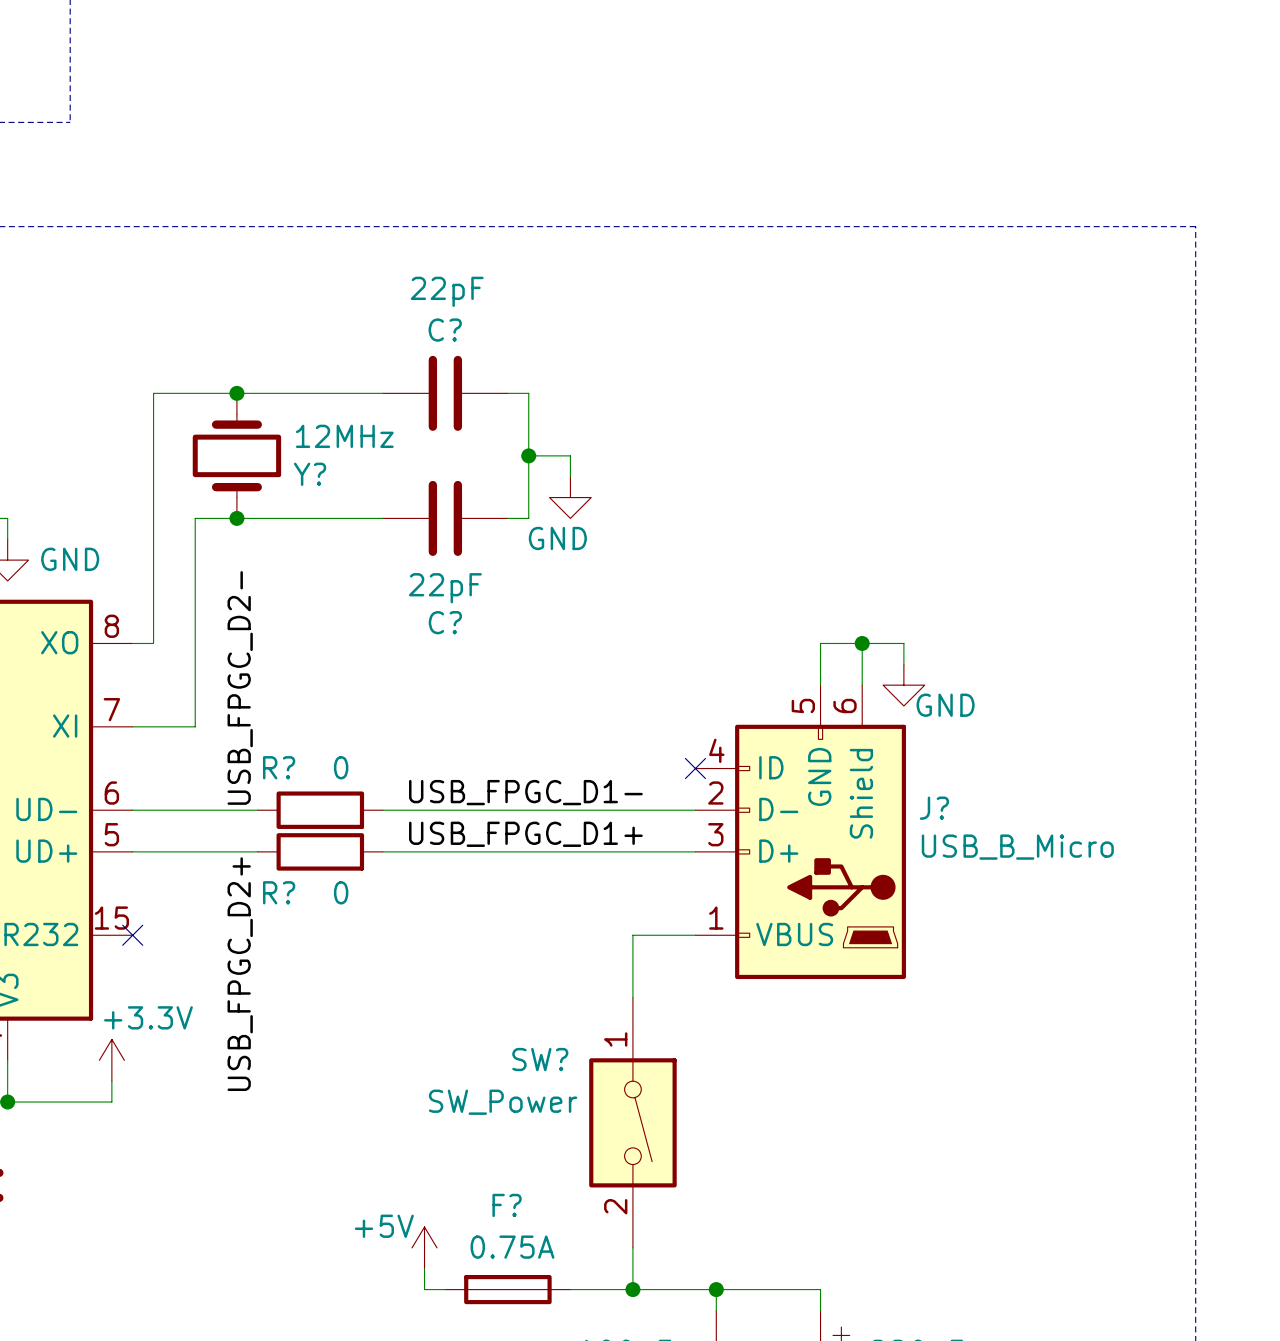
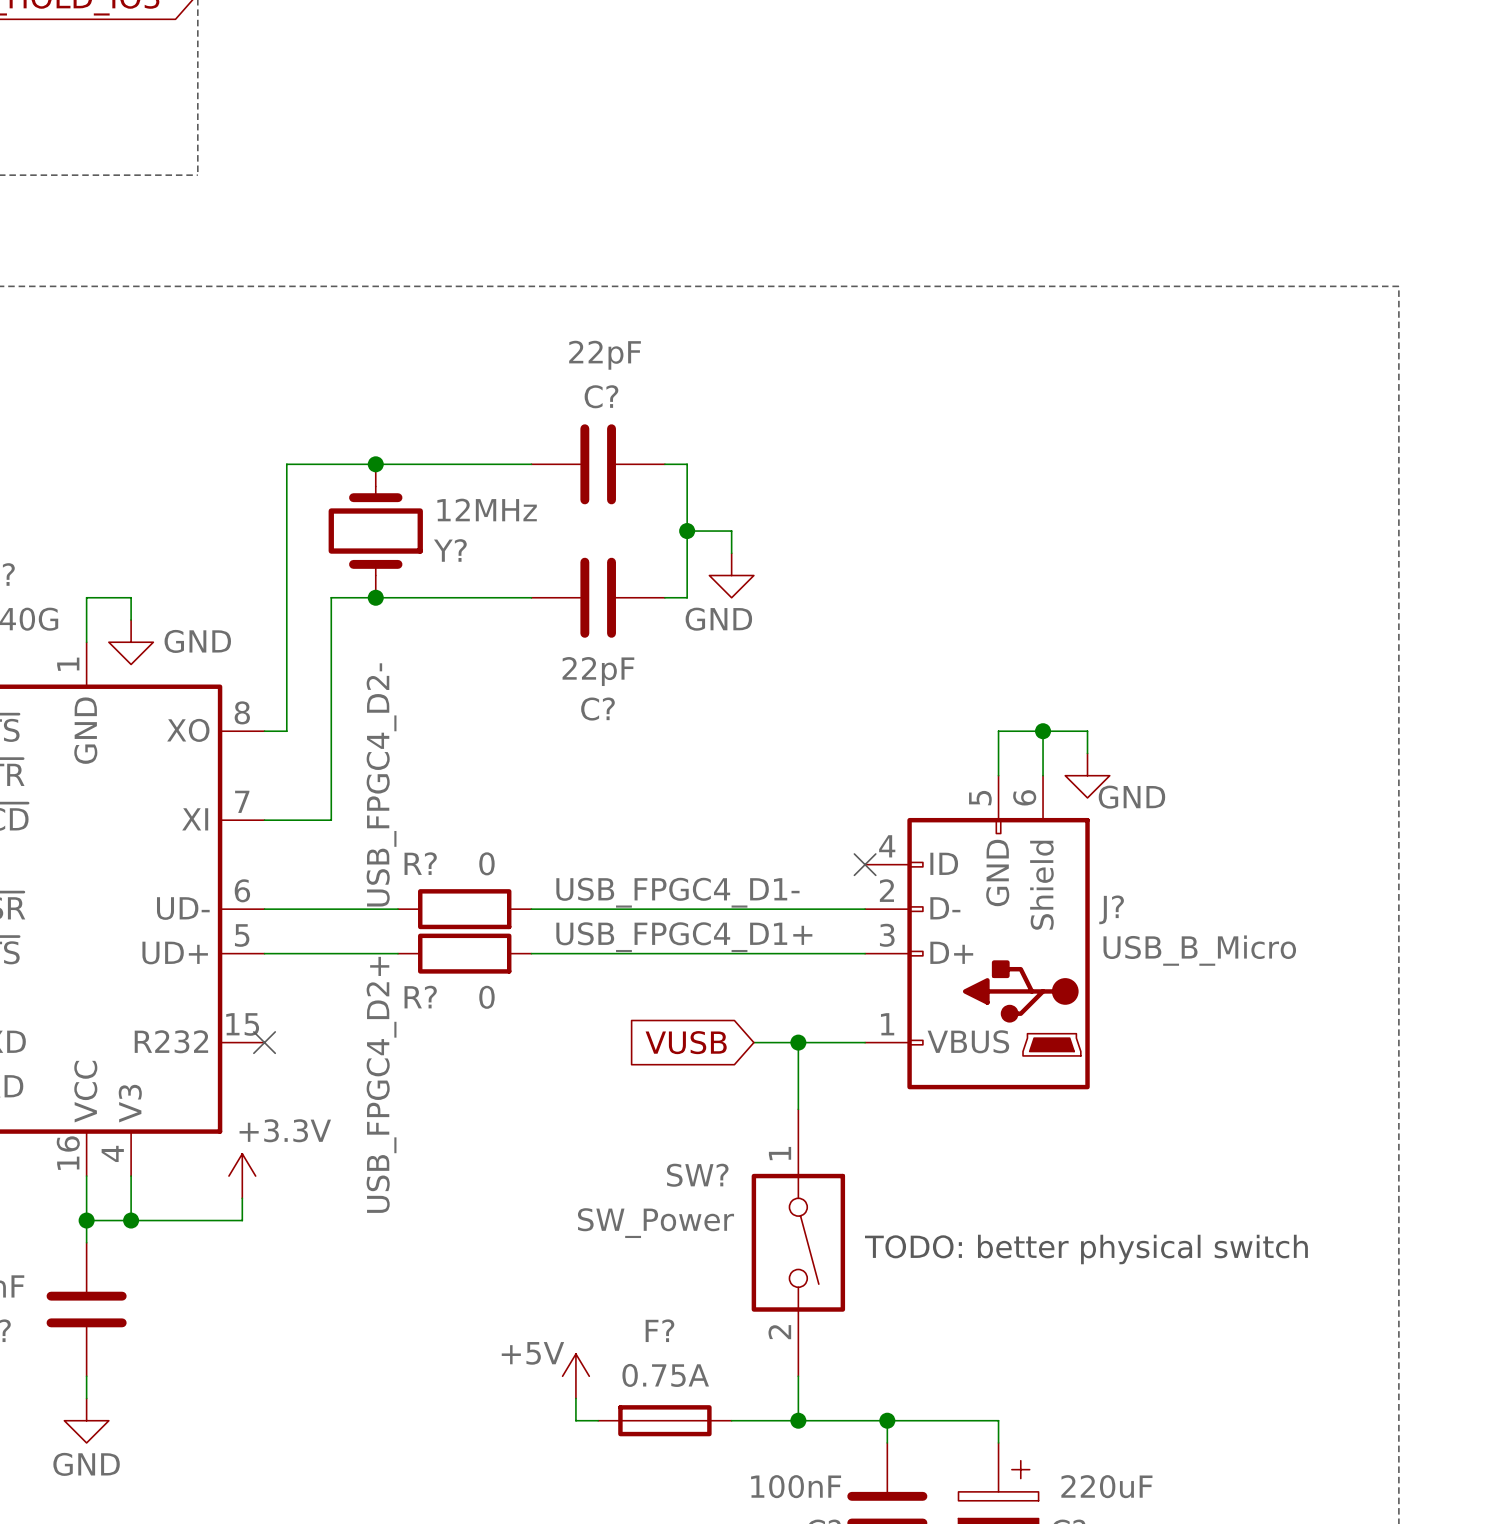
label: USB_FPGC_D2- (240, 687) -> USB_FPGC4_D2- (381, 784)
label: USB_FPGC_D1- (525, 792) -> USB_FPGC4_D1- (677, 892)
label: USB_FPGC_D1+ (525, 834) -> USB_FPGC4_D1+ (684, 937)
global label: none -> VUSB (686, 1042)
wire: none -> (753, 1042) (798, 1042)
junction: none -> (798, 1042)
label: USB_FPGC_D2+ (240, 974) -> USB_FPGC4_D2+ (381, 1084)
text: none -> TODO: better physical switch (1086, 1249)

